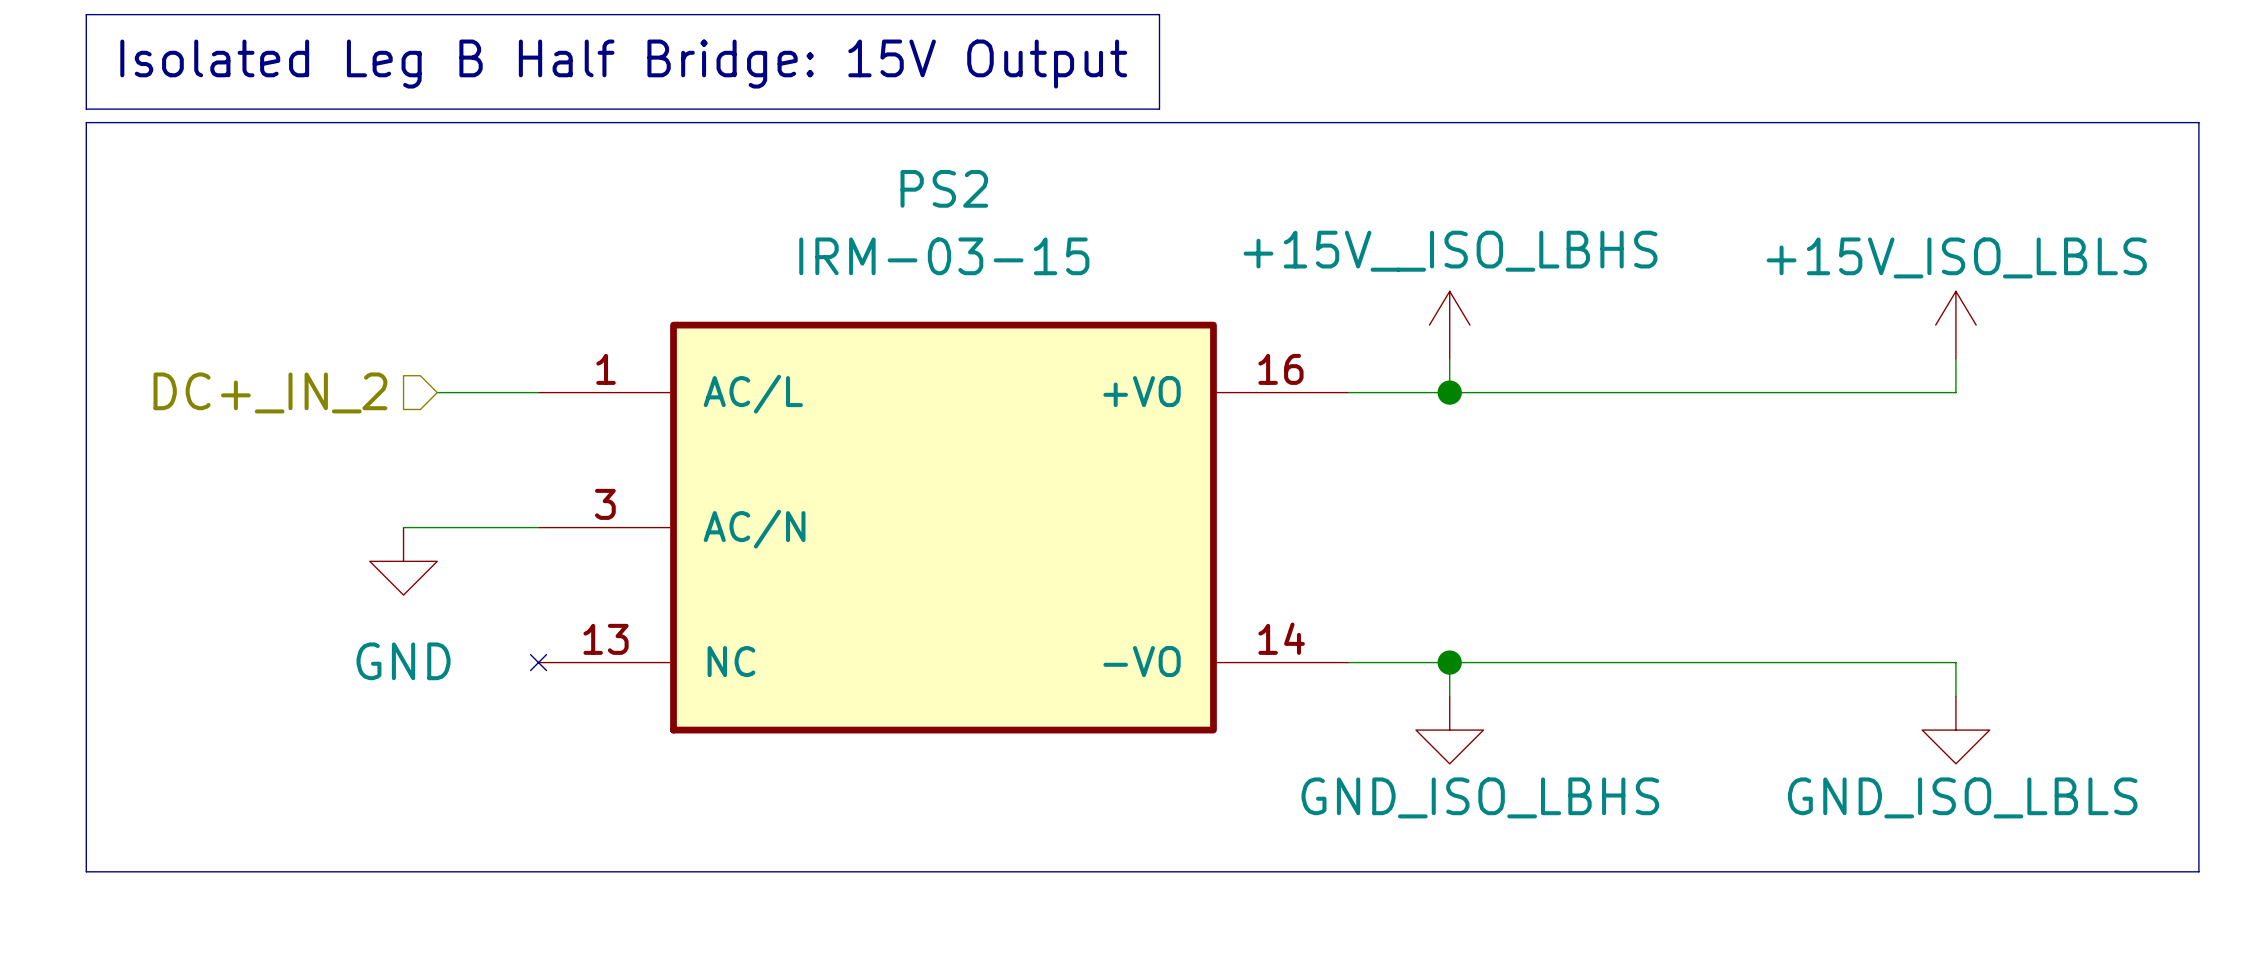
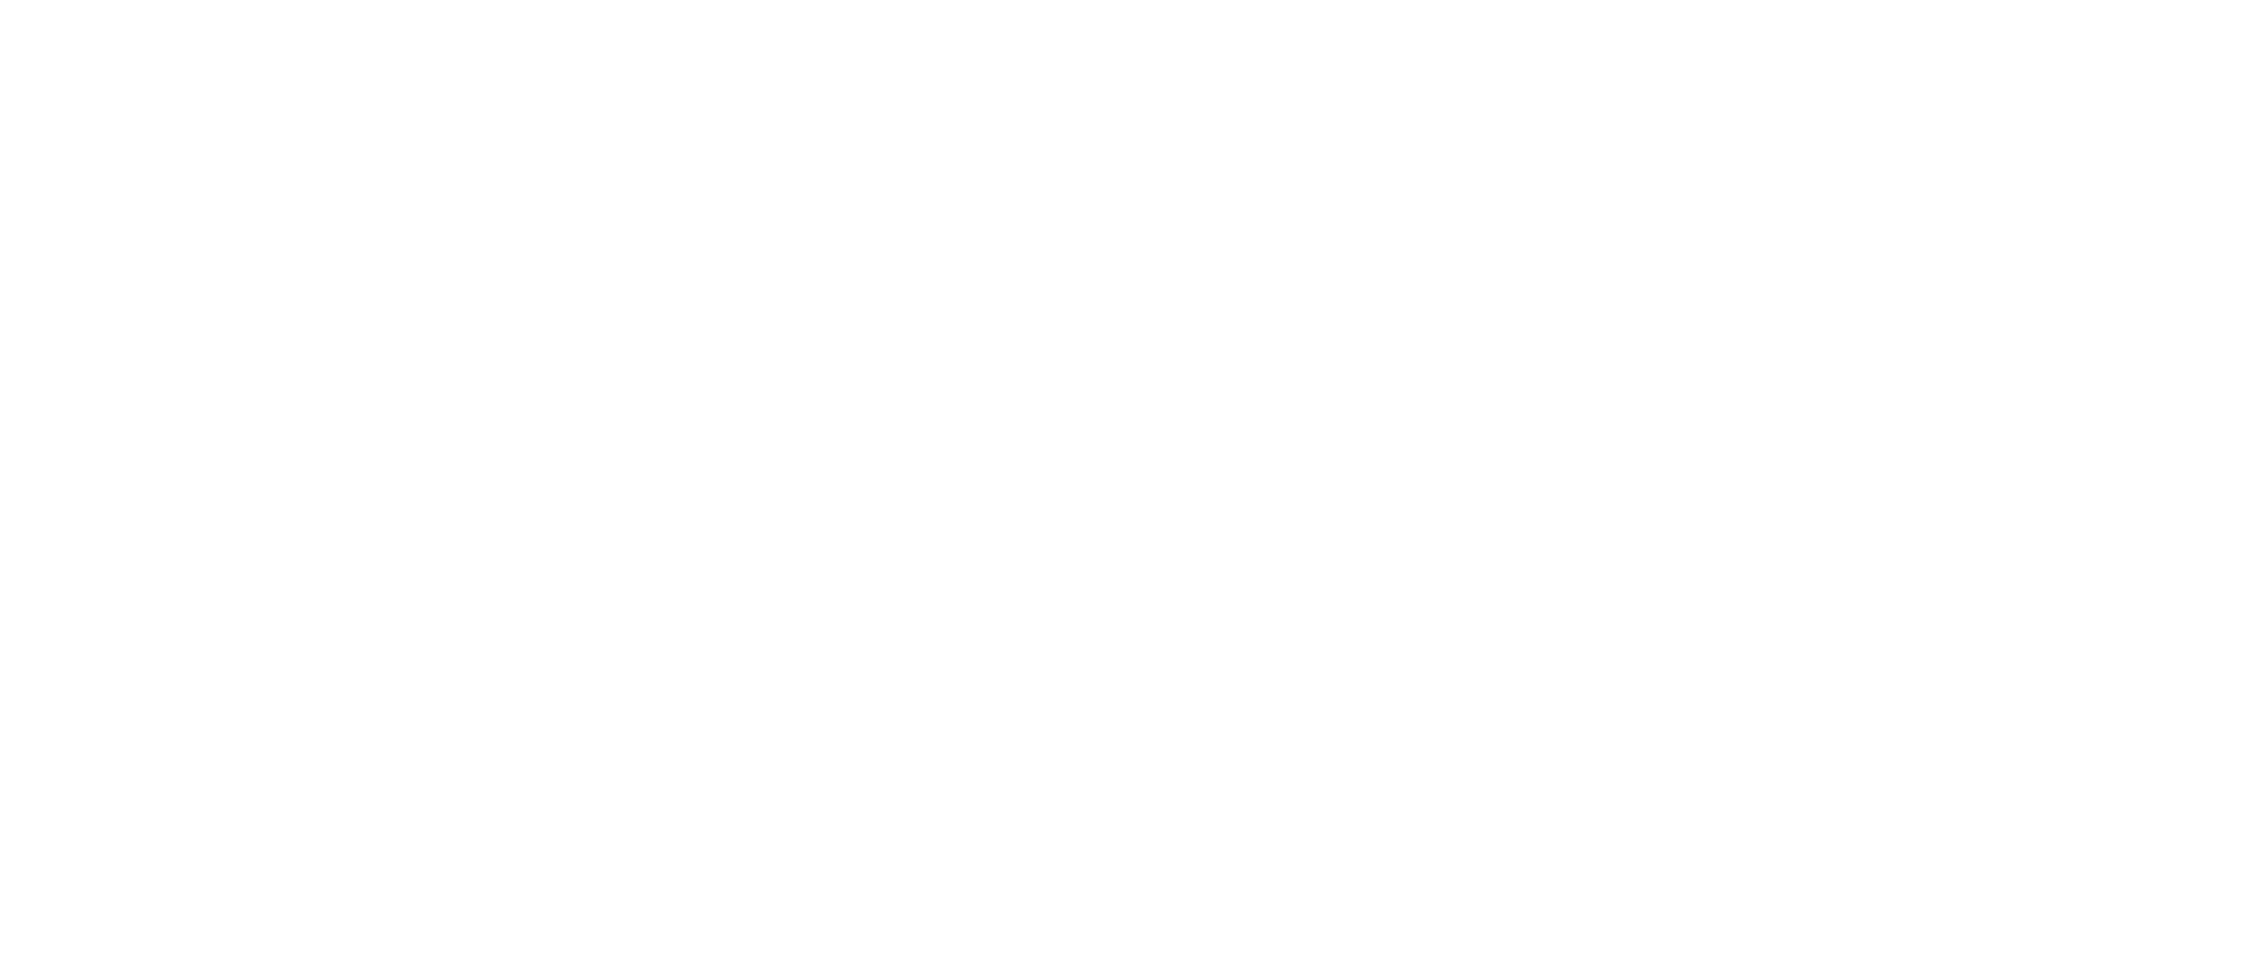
line: (86, 14) (86, 109) (1159, 109) (1159, 14) (86, 14) -> none
text: Isolated Leg B Half Bridge: 15V Output (623, 64) -> none
line: (86, 122) (2198, 122) (2198, 871) (86, 871) (86, 122) -> none
power symbol: +15V__ISO_LBHS (1449, 325) -> none
power symbol: +15V_ISO_LBLS (1955, 325) -> none
wire: (1449, 358) (1449, 392) -> none
wire: (1955, 358) (1955, 392) (1348, 392) -> none
hierarchical label: DC+_IN_2 (270, 392) -> none
wire: (437, 392) (538, 392) -> none
junction: (1449, 392) -> none
wire: (403, 527) (538, 527) -> none
PS2: IRM-03-15 (939, 527) -> none
power symbol: GND (403, 561) -> none
wire: (1348, 662) (1955, 662) (1955, 696) -> none
wire: (1449, 662) (1449, 696) -> none
junction: (1449, 662) -> none
power symbol: GND_ISO_LBHS (1449, 730) -> none
power symbol: GND_ISO_LBLS (1955, 730) -> none

